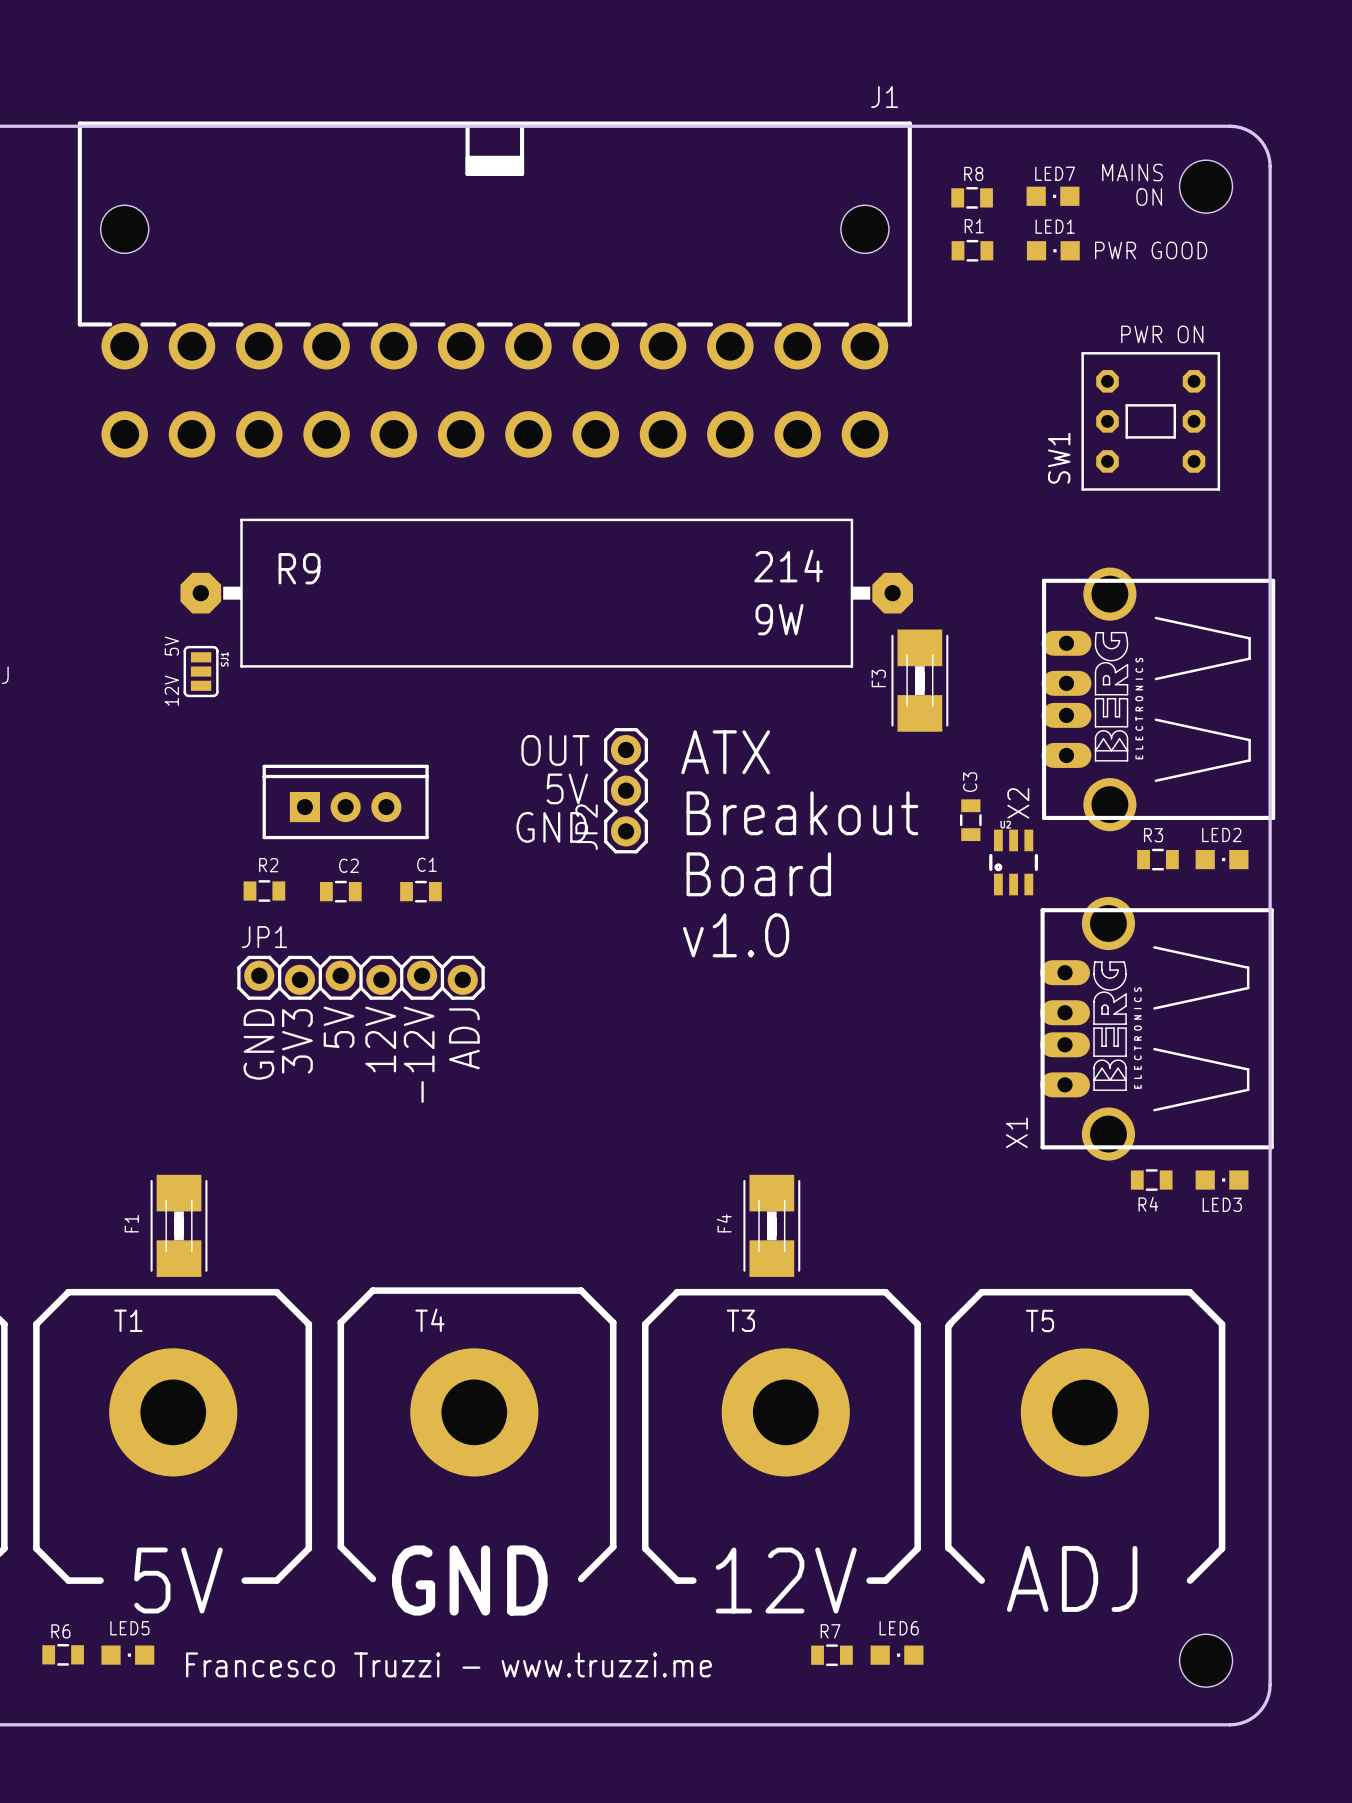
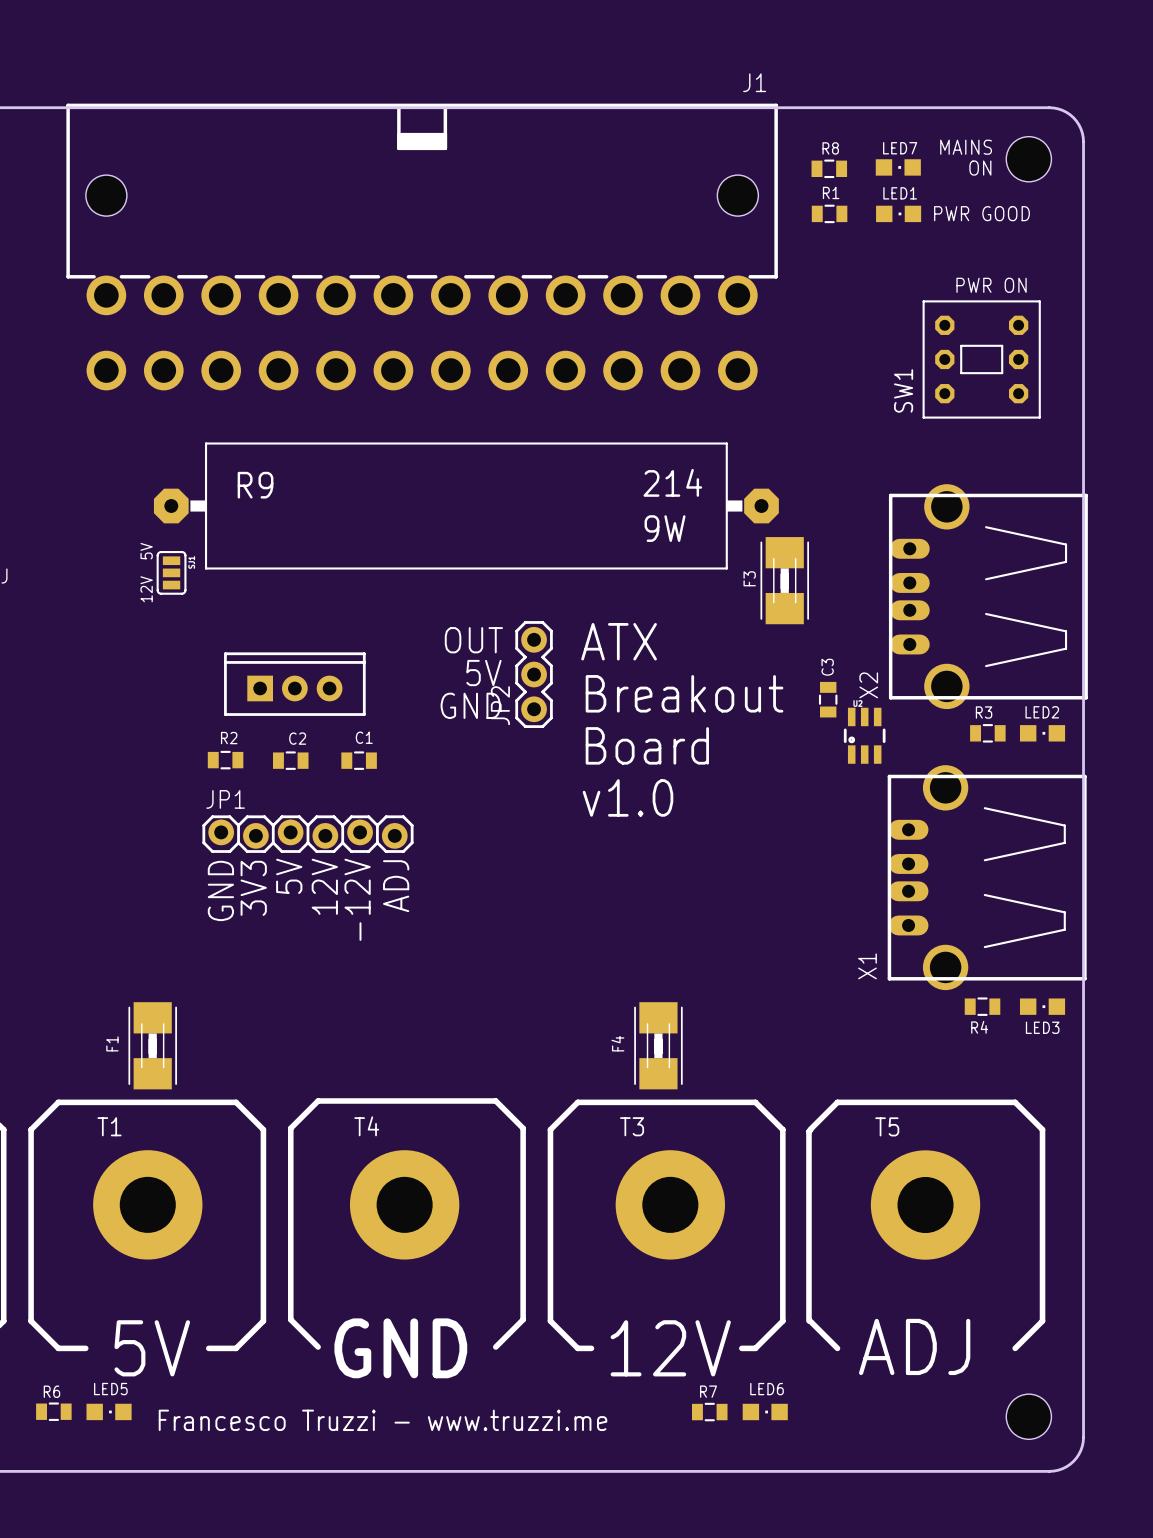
X2 footprint: [1041, 567, 1276, 832] -> [888, 484, 1088, 710]
X1 footprint: [1040, 896, 1274, 1161] -> [887, 765, 1087, 991]

